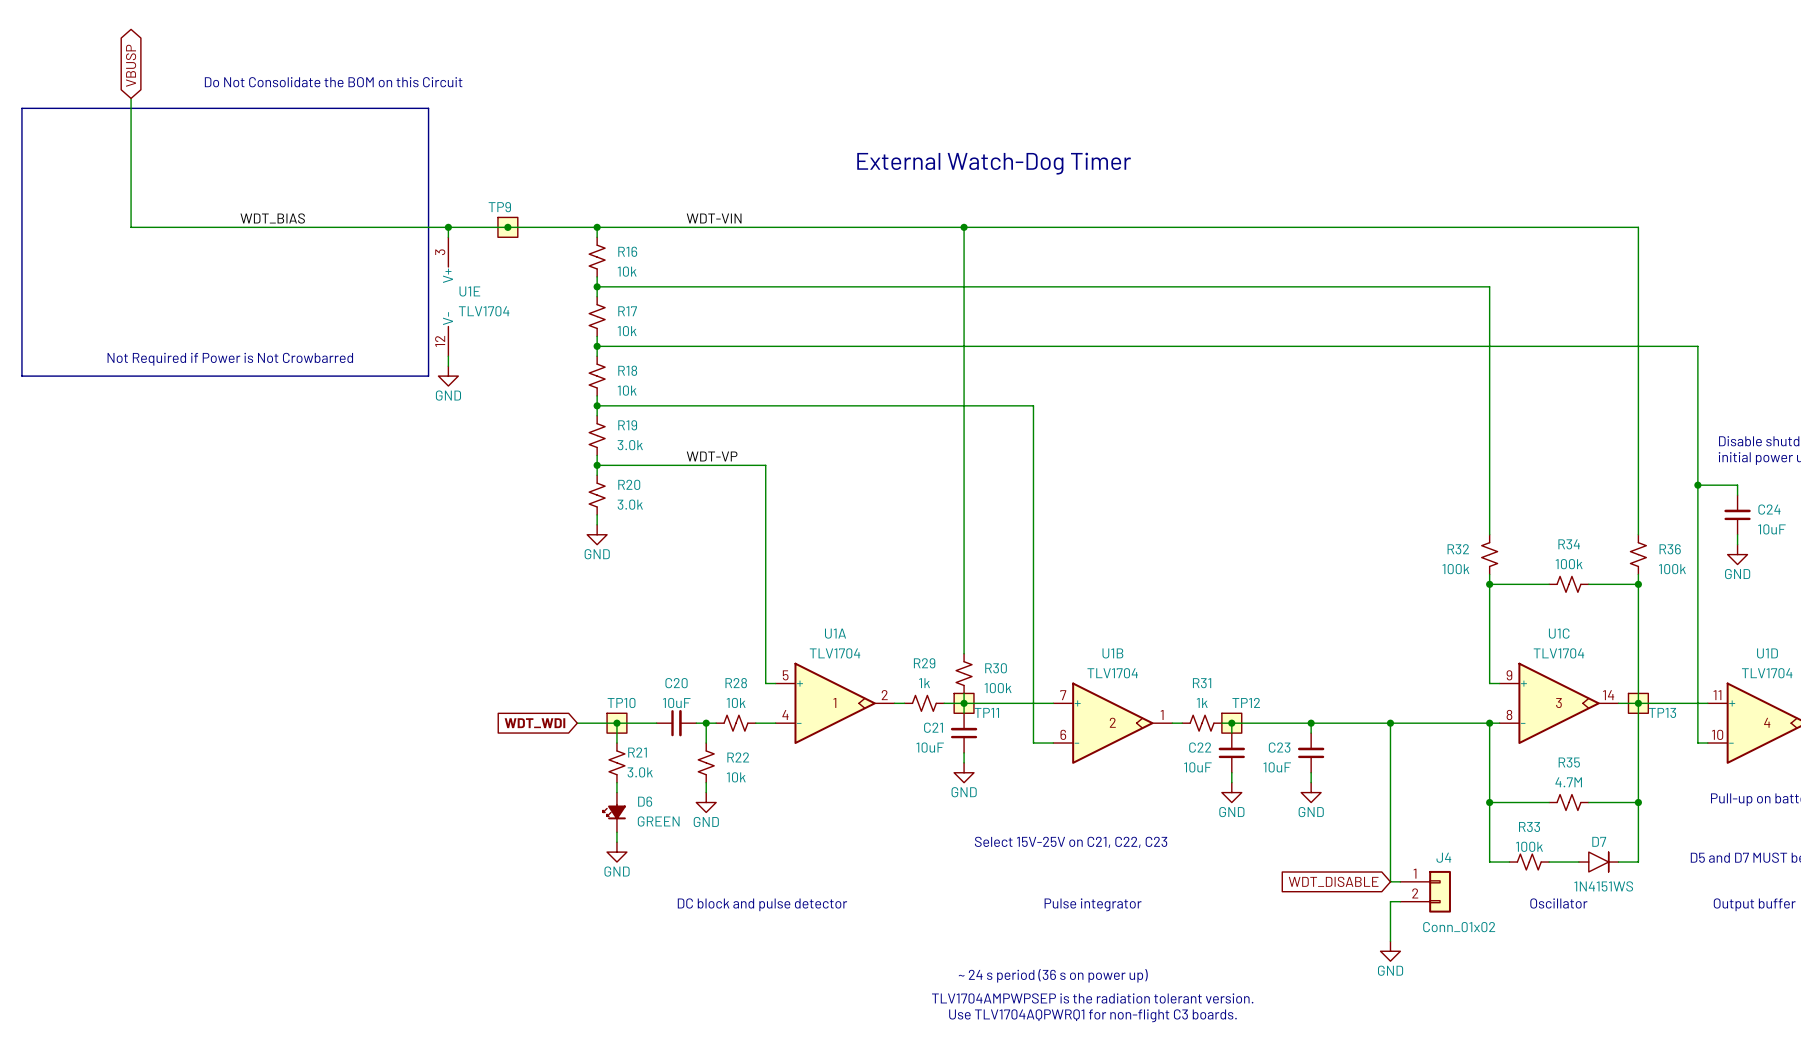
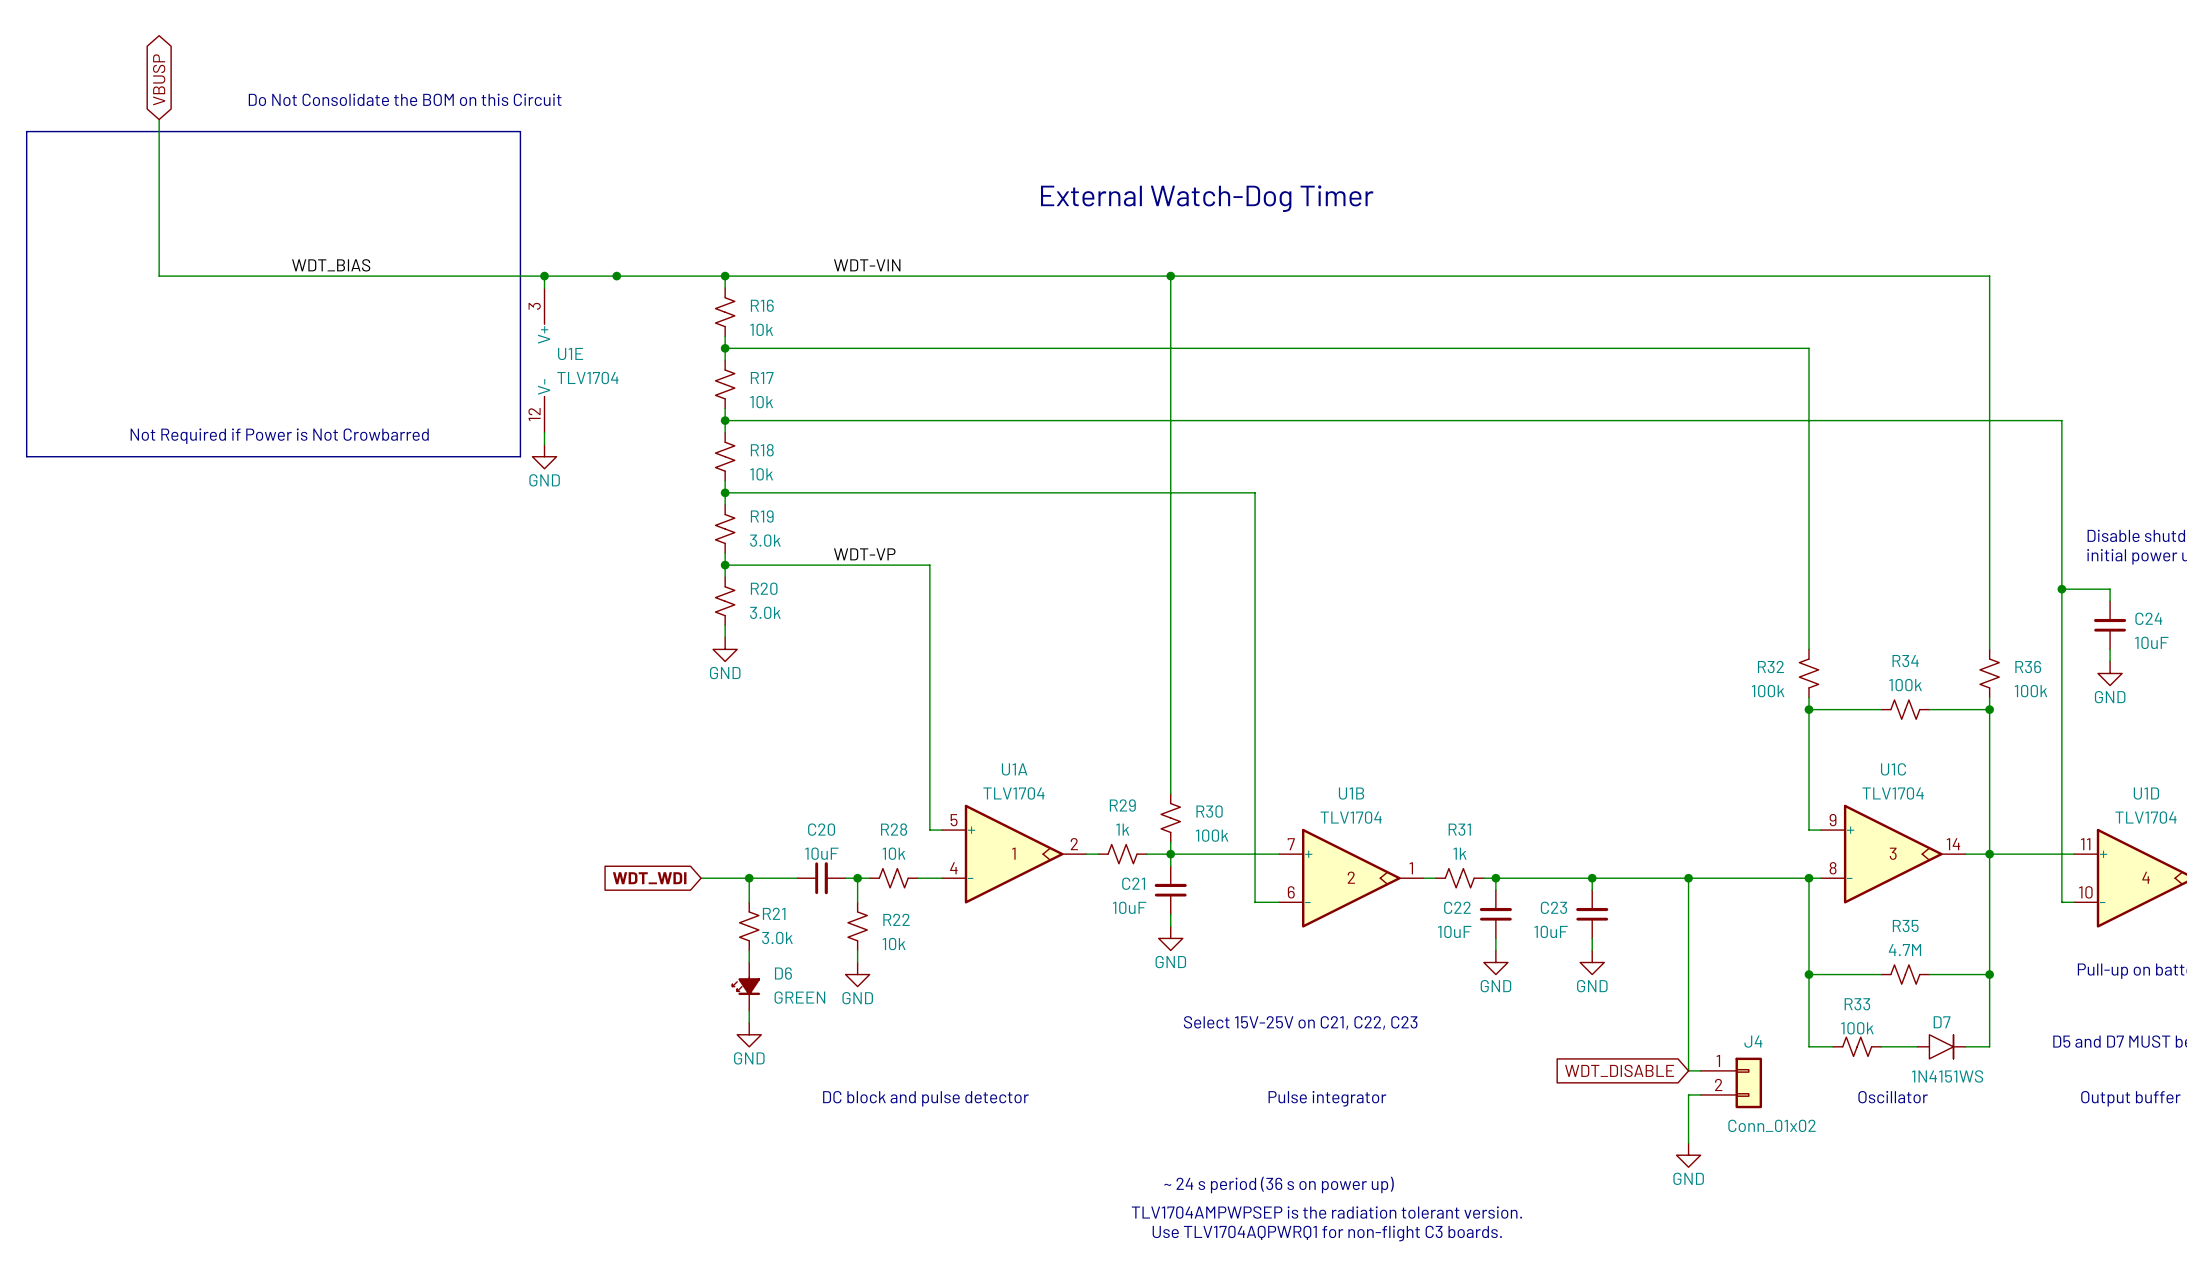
TP9: (507, 227) -> none
TP11: (964, 703) -> none
TP13: (1638, 703) -> none
TP10: (616, 723) -> none
TP12: (1231, 723) -> none

